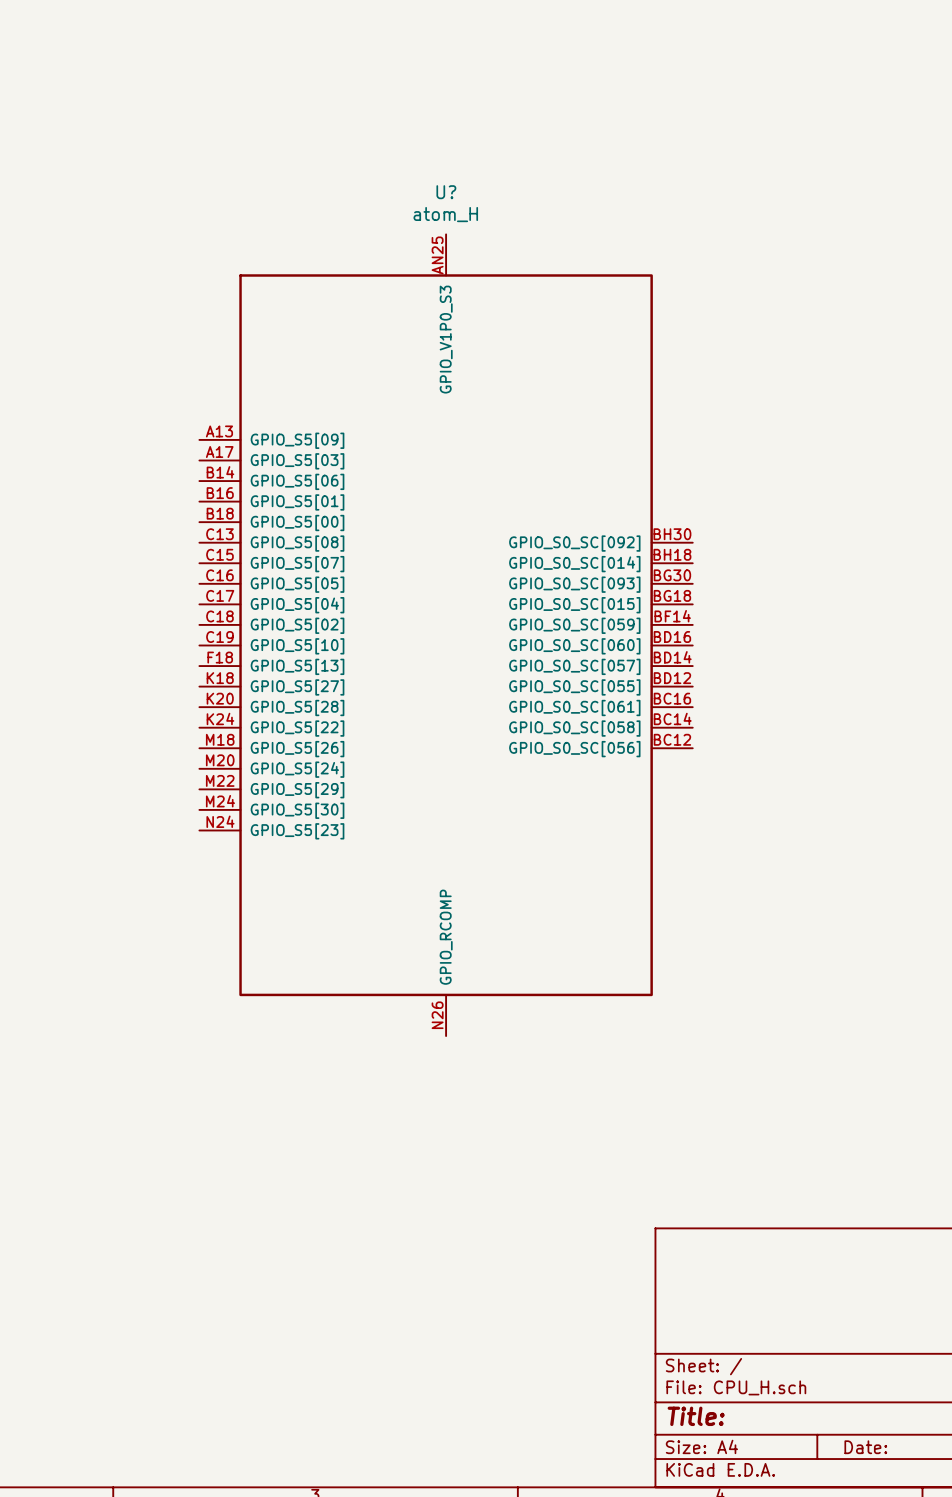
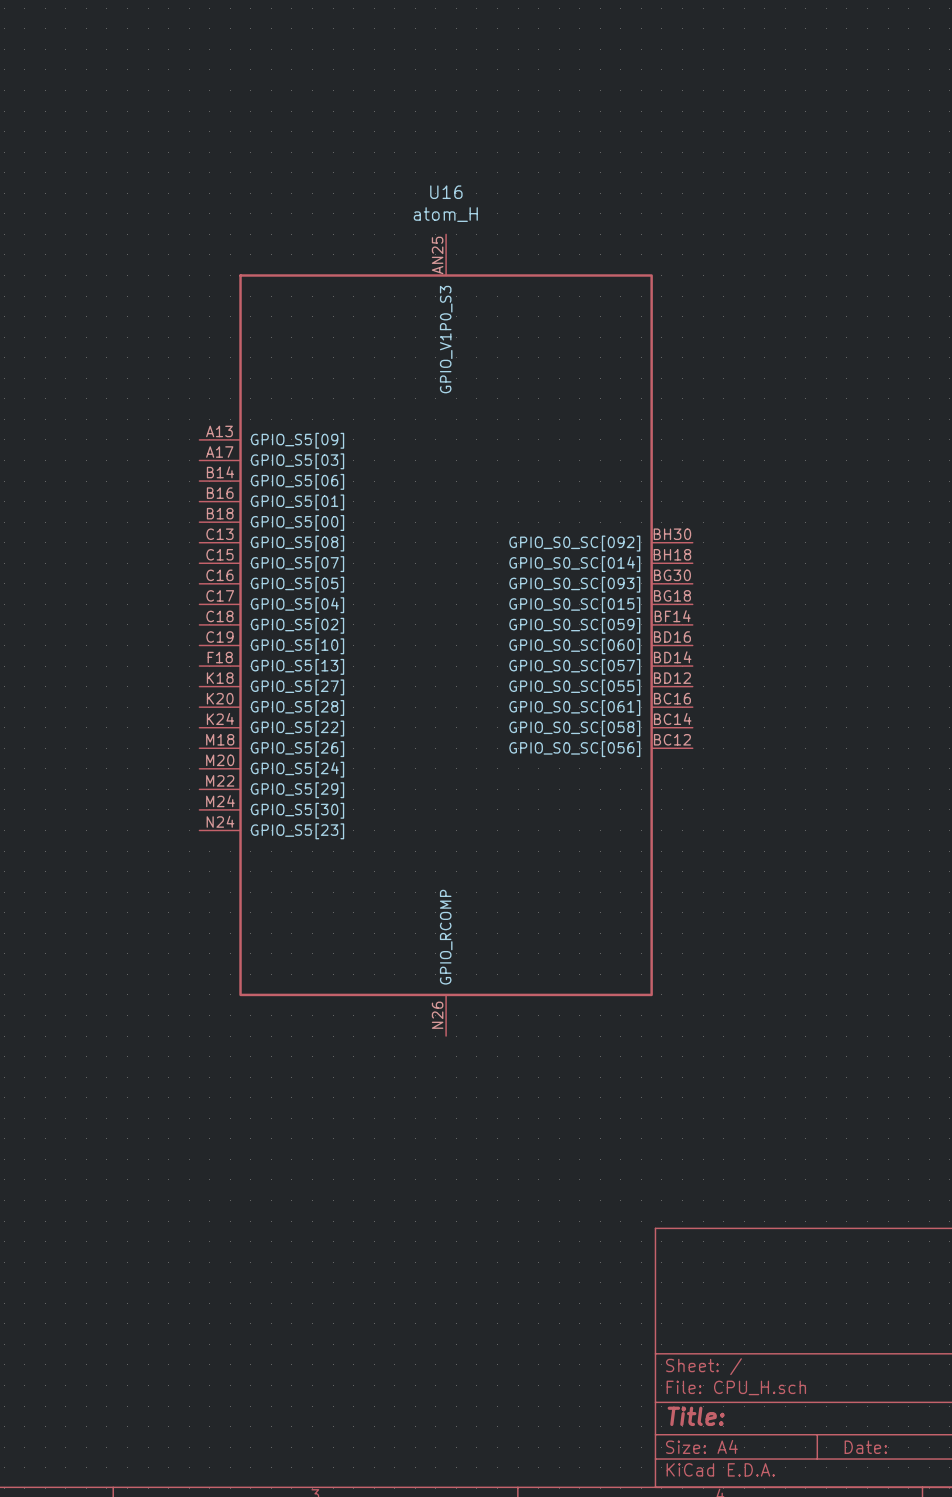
U? name: U? (446, 192) -> U16 (446, 192)

